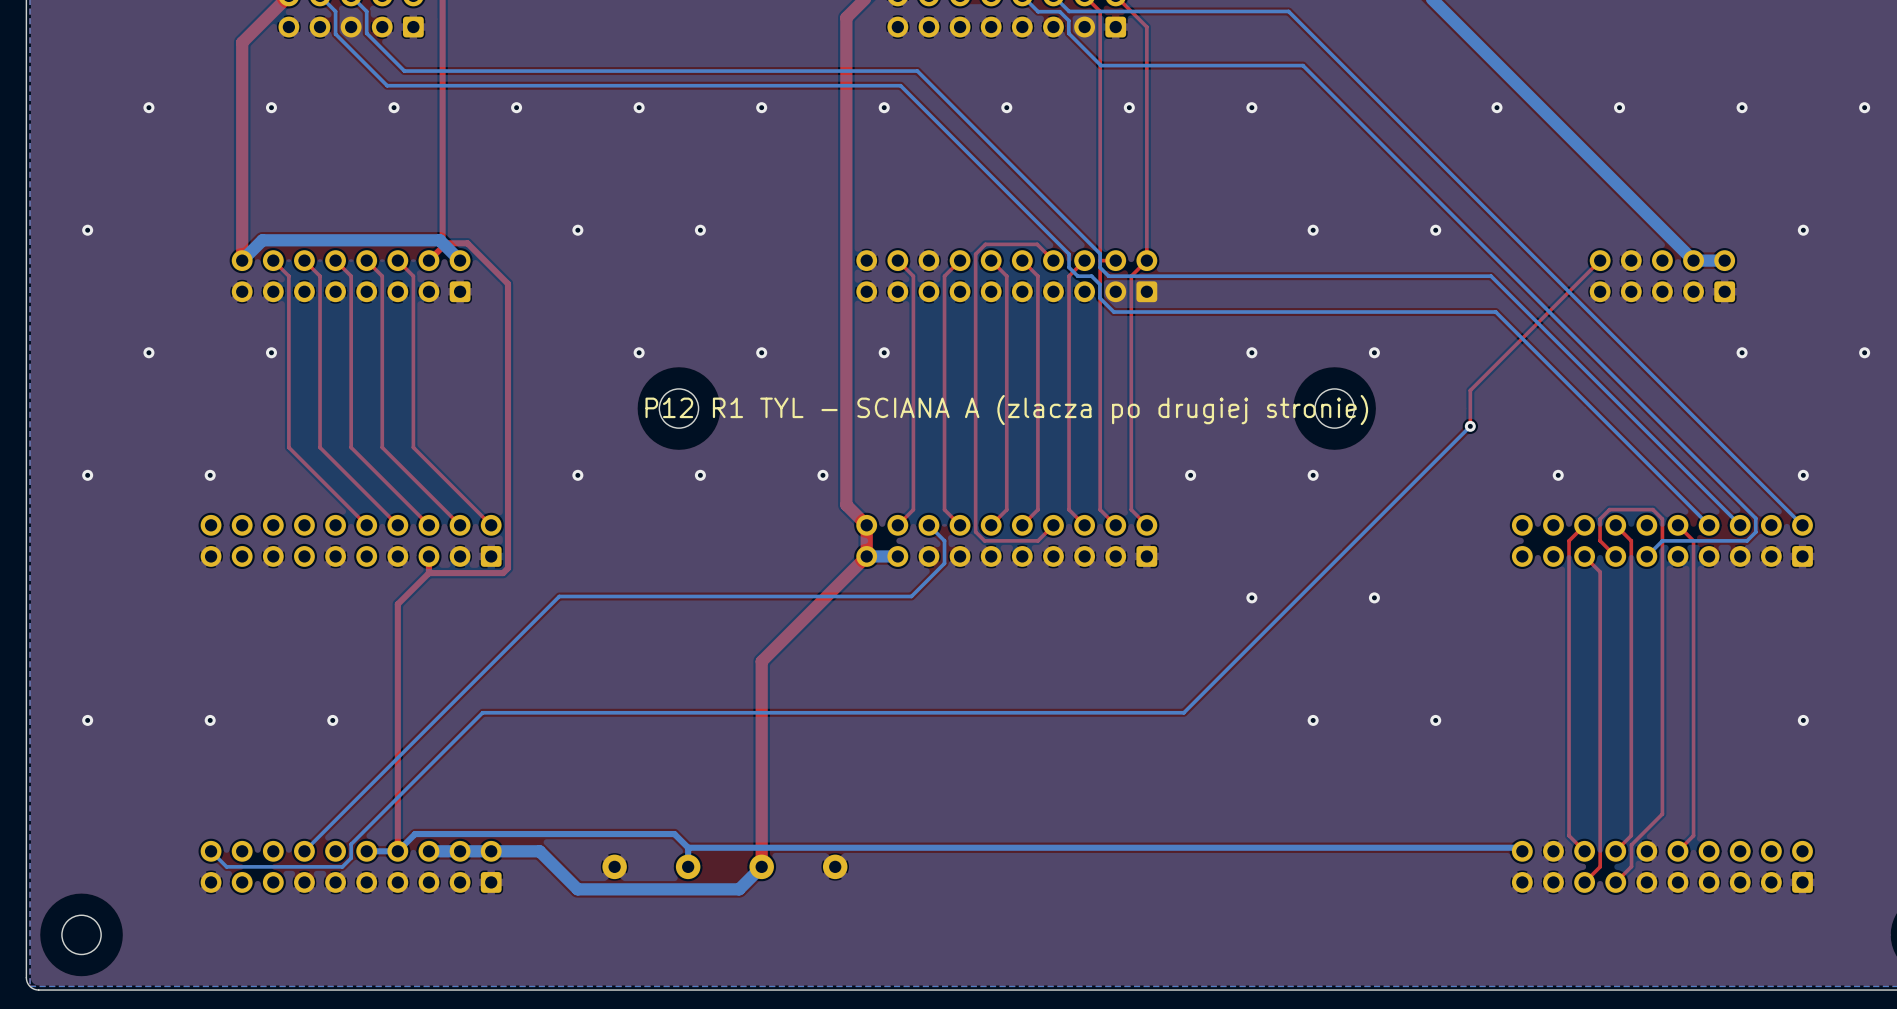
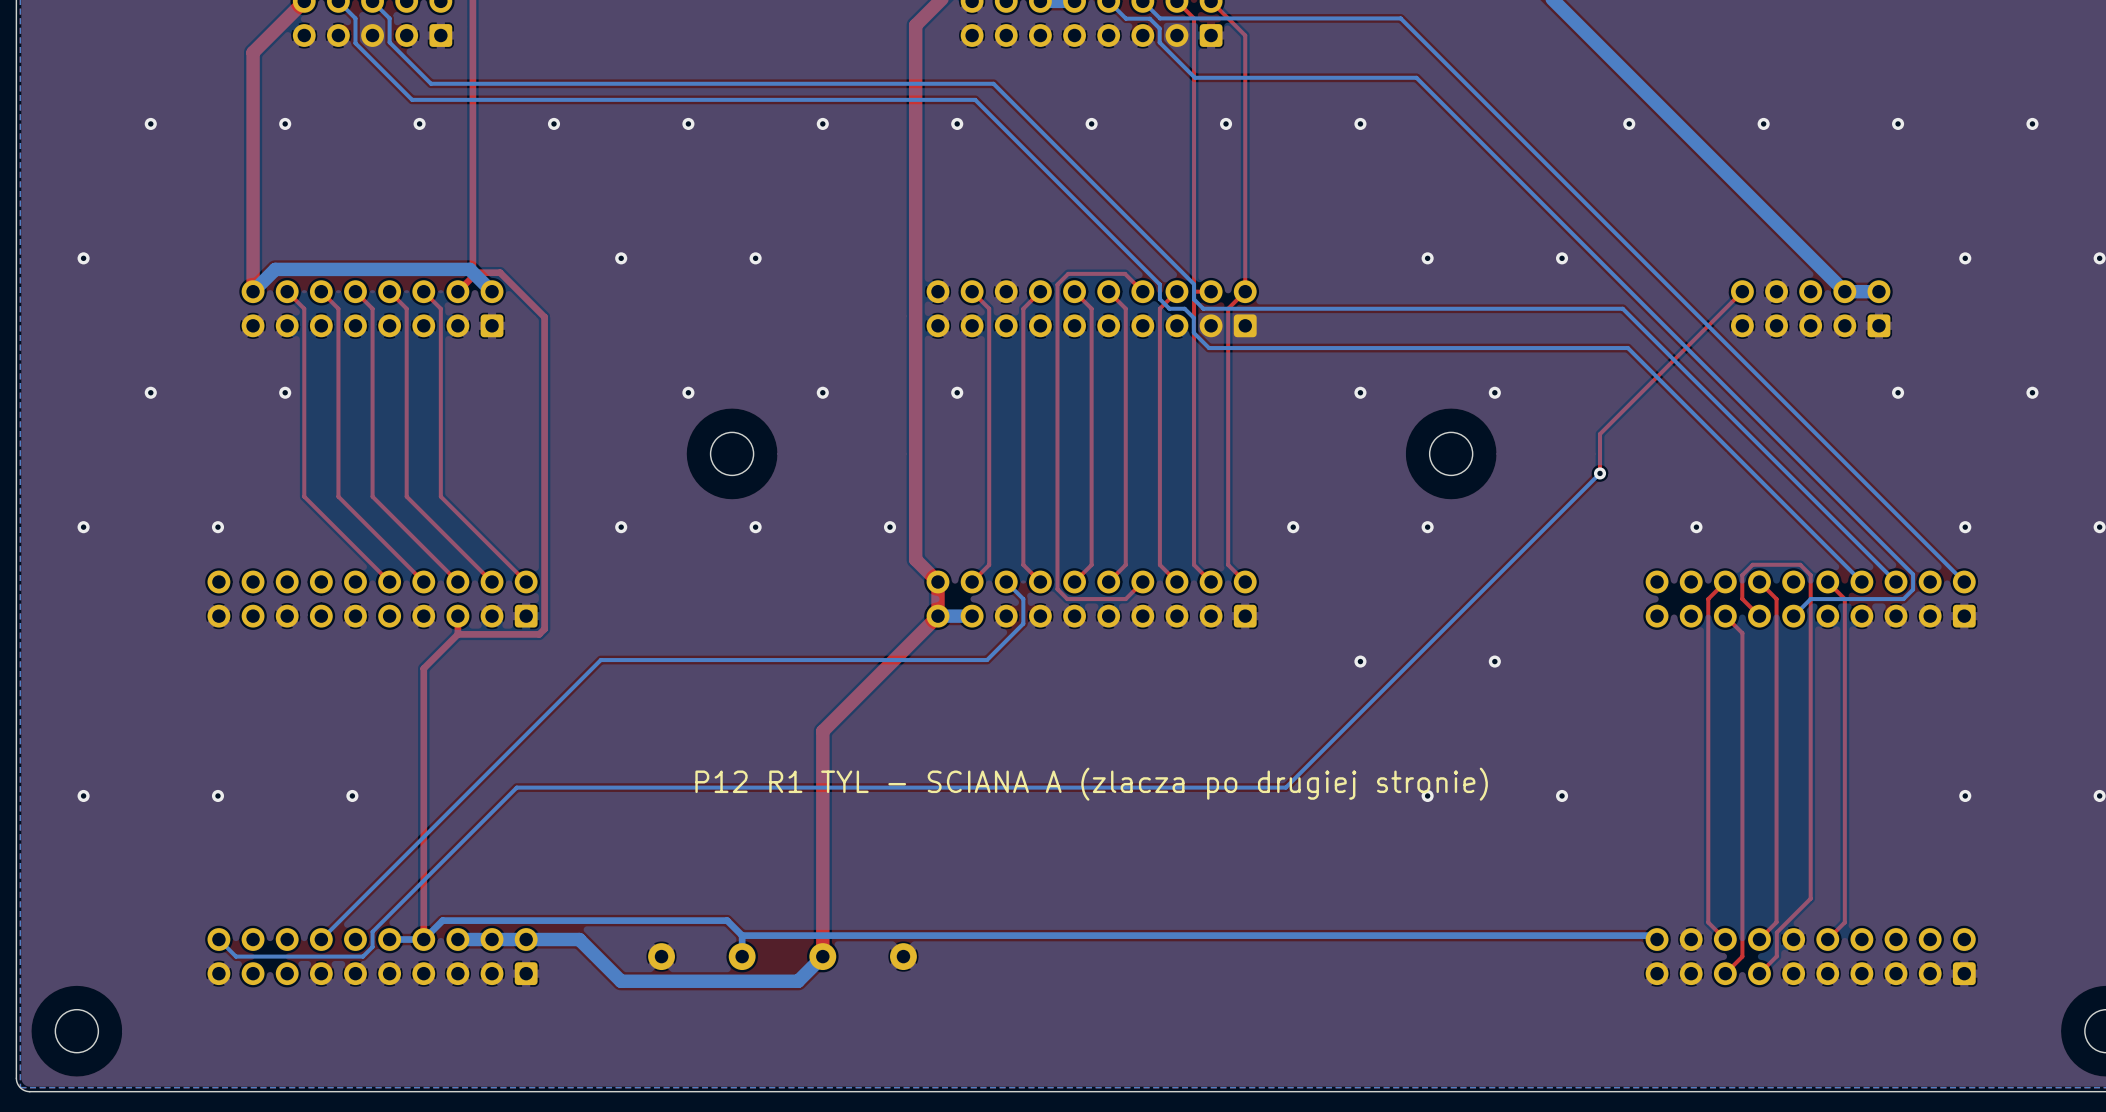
text position: P12 R1 TYL - SCIANA A (zlacza po drugiej stronie) (1006, 410) -> P12 R1 TYL - SCIANA A (zlacza po drugiej stronie) (1091, 784)

